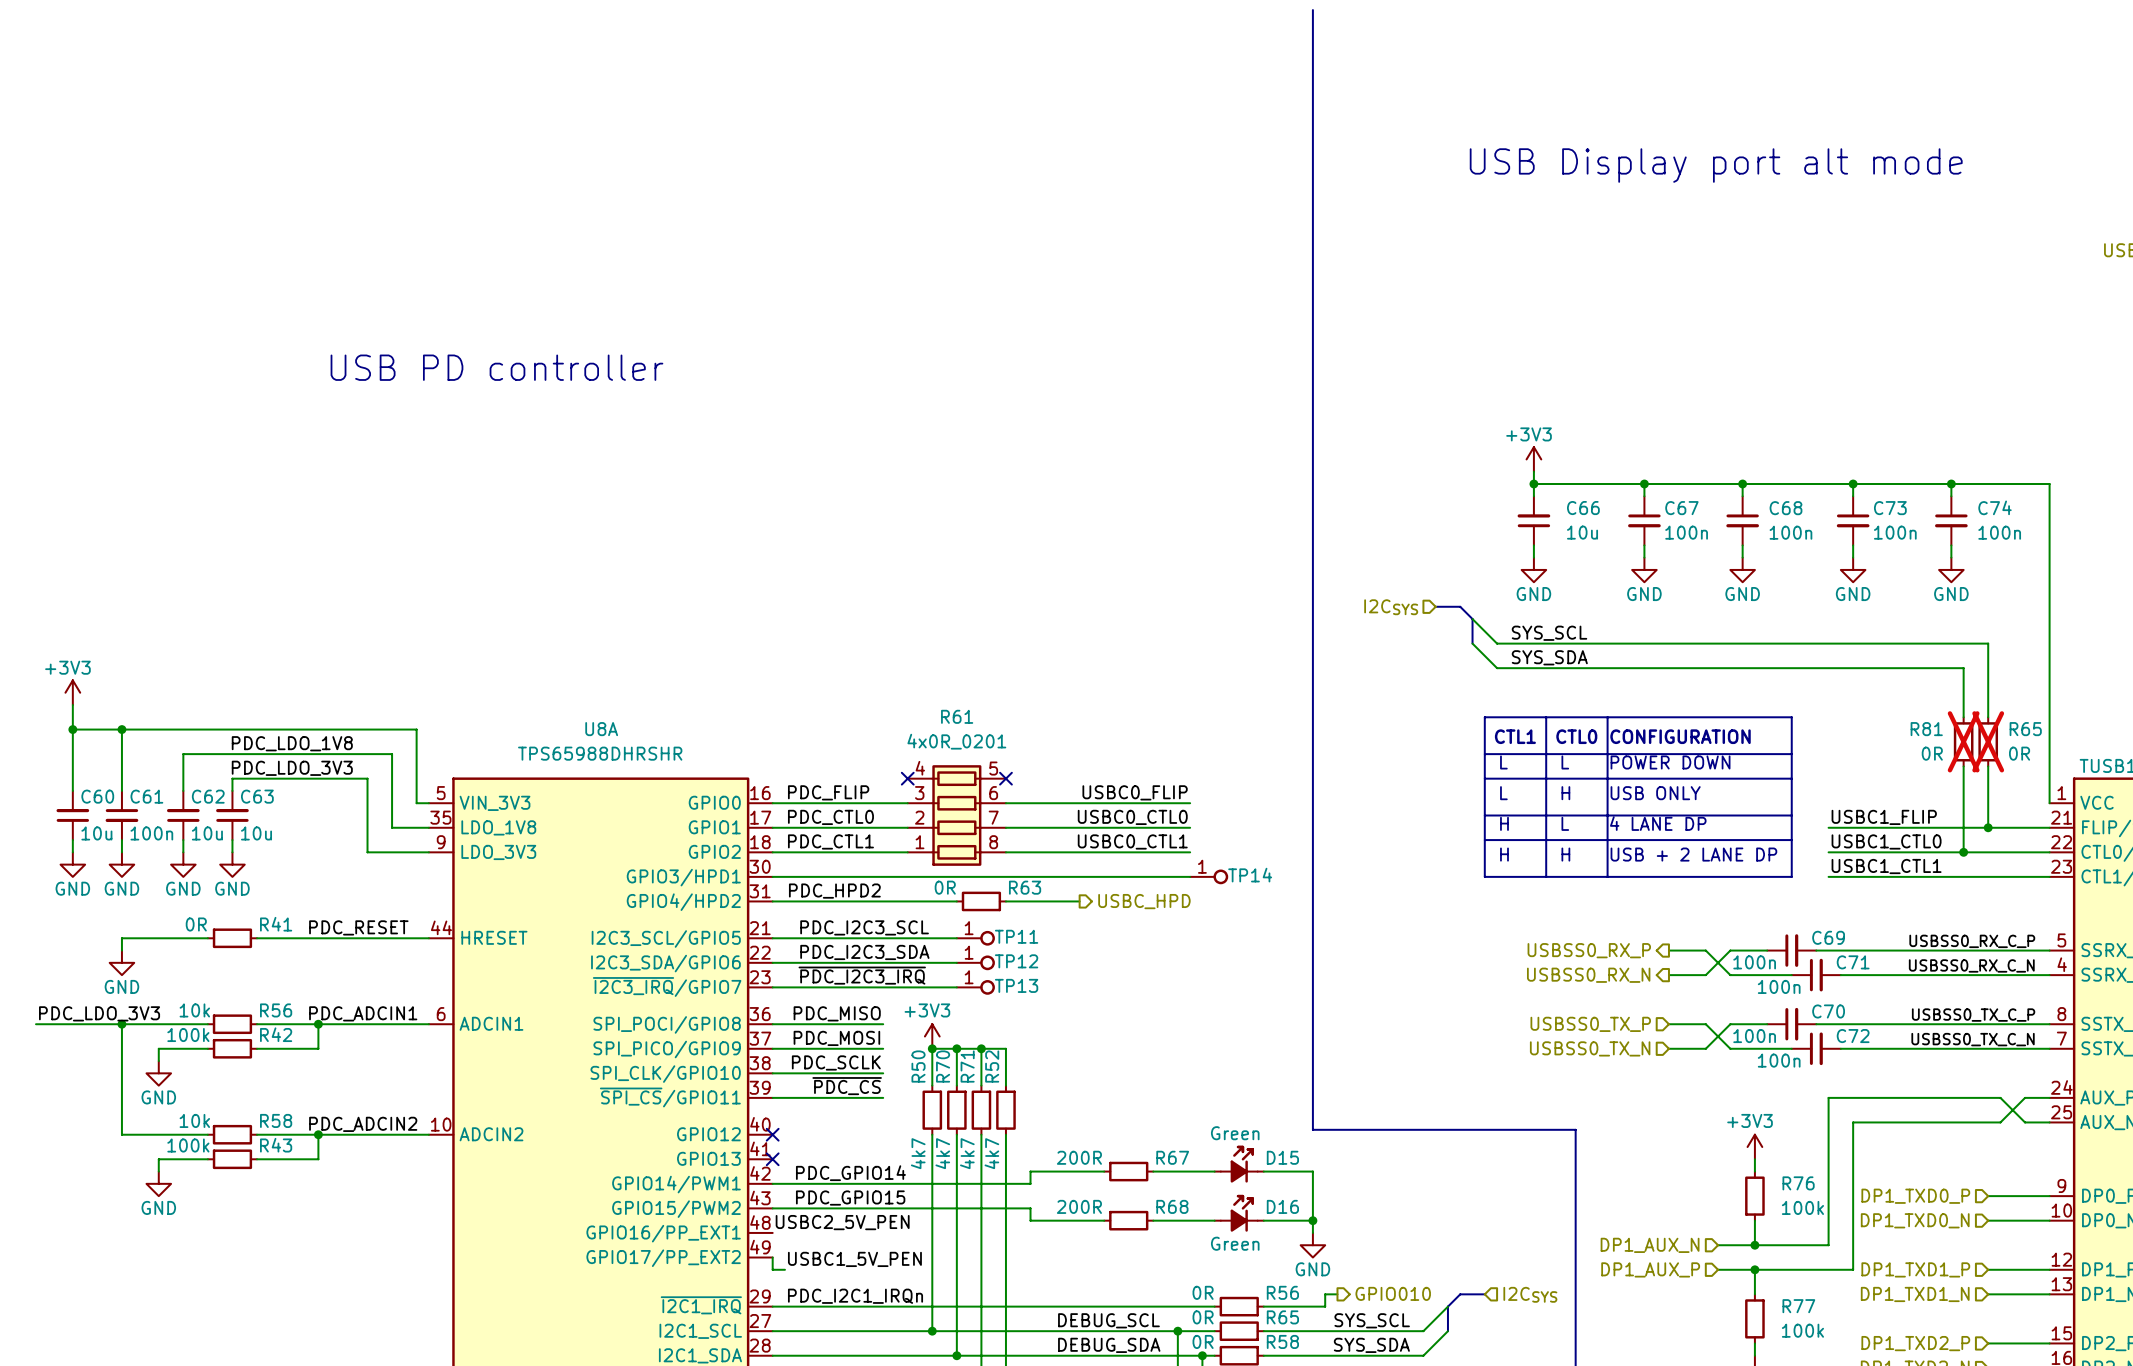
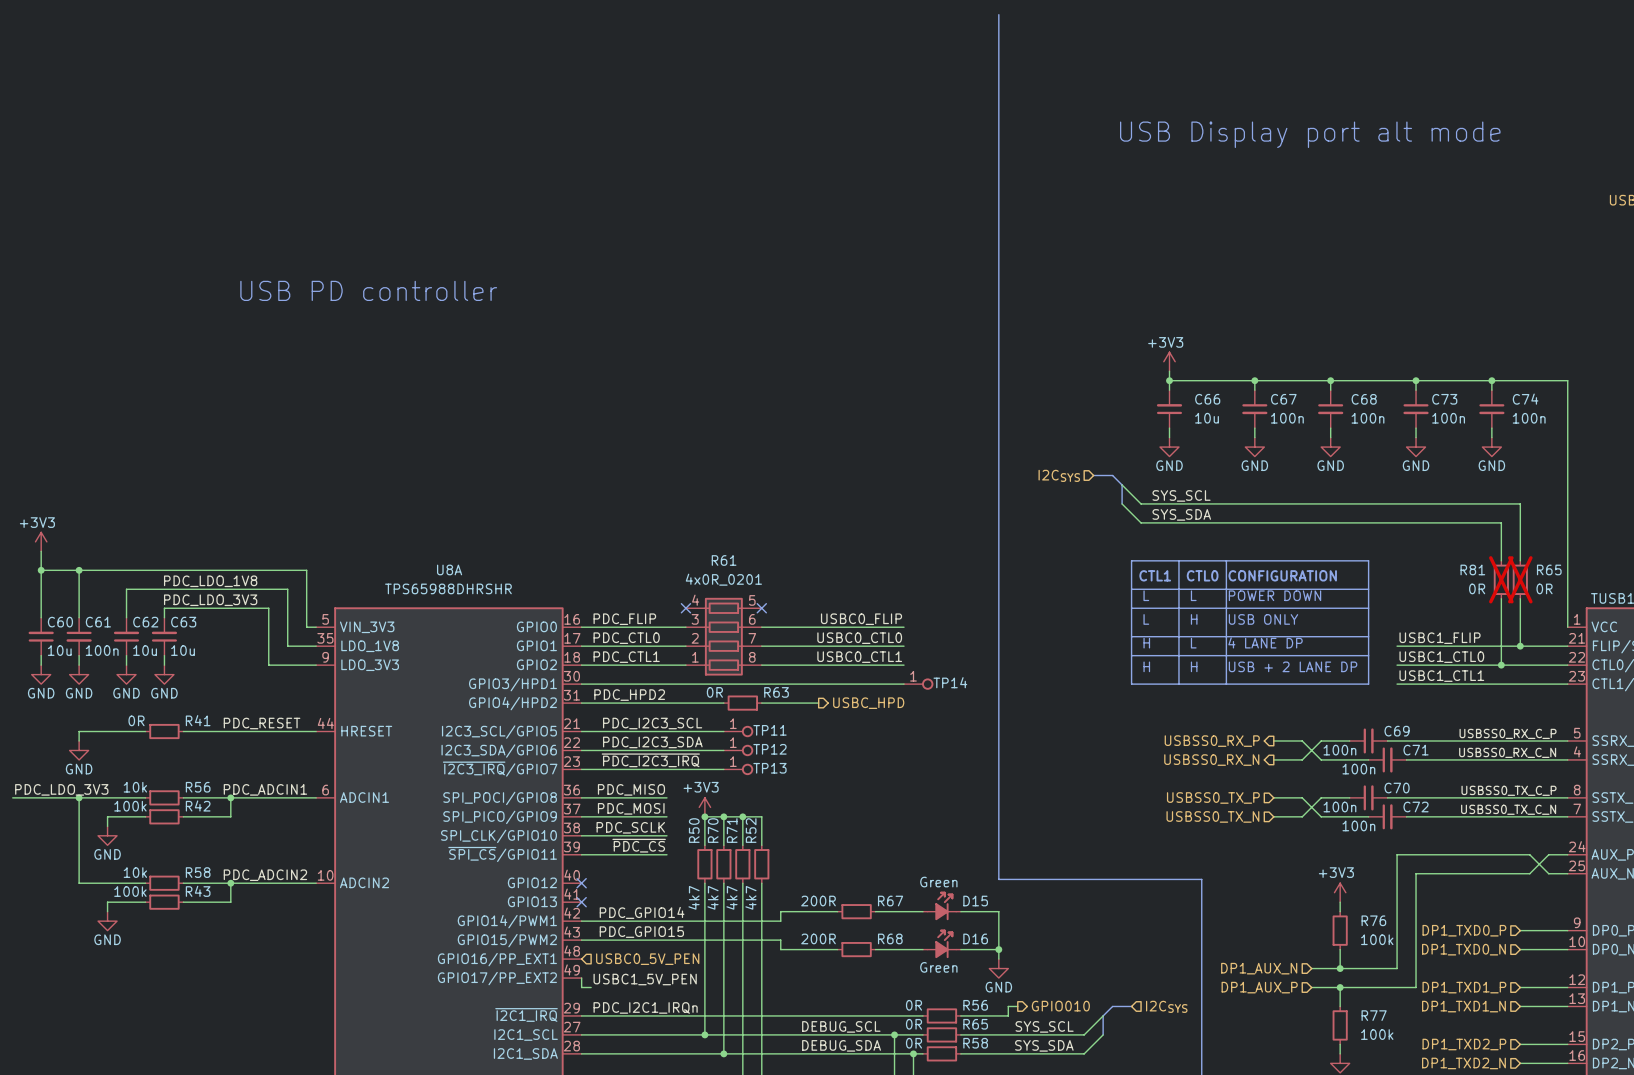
label: USBC2_5V_PEN (842, 1222) -> none
hierarchical label: none -> USBC0_5V_PEN (647, 959)

